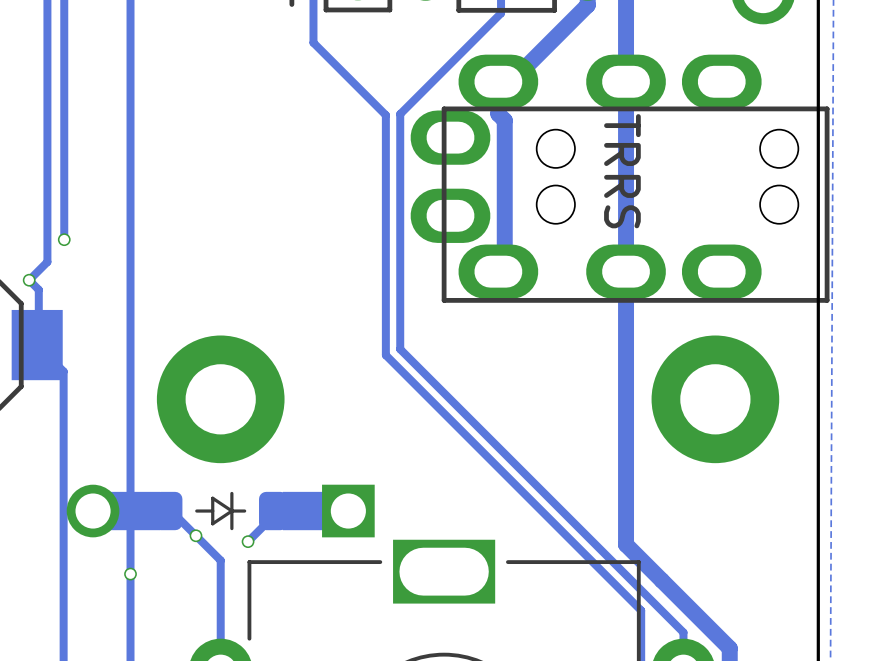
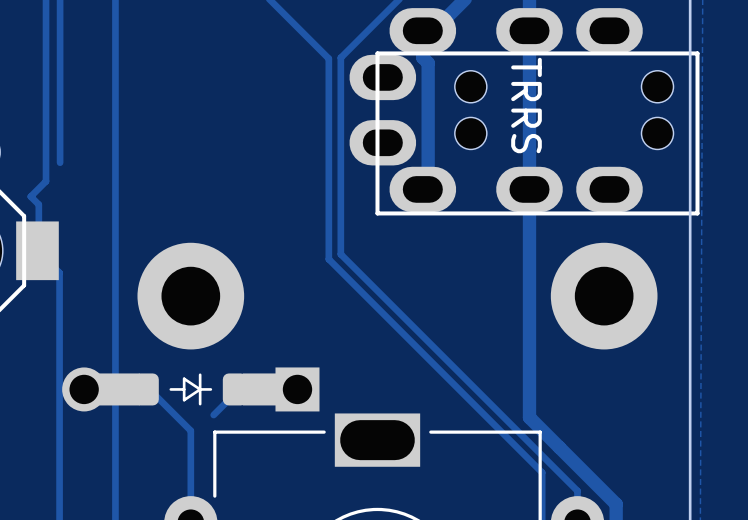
via: (64, 239) -> none
via: (29, 280) -> none
via: (195, 535) -> none
via: (248, 541) -> none
via: (130, 574) -> none

